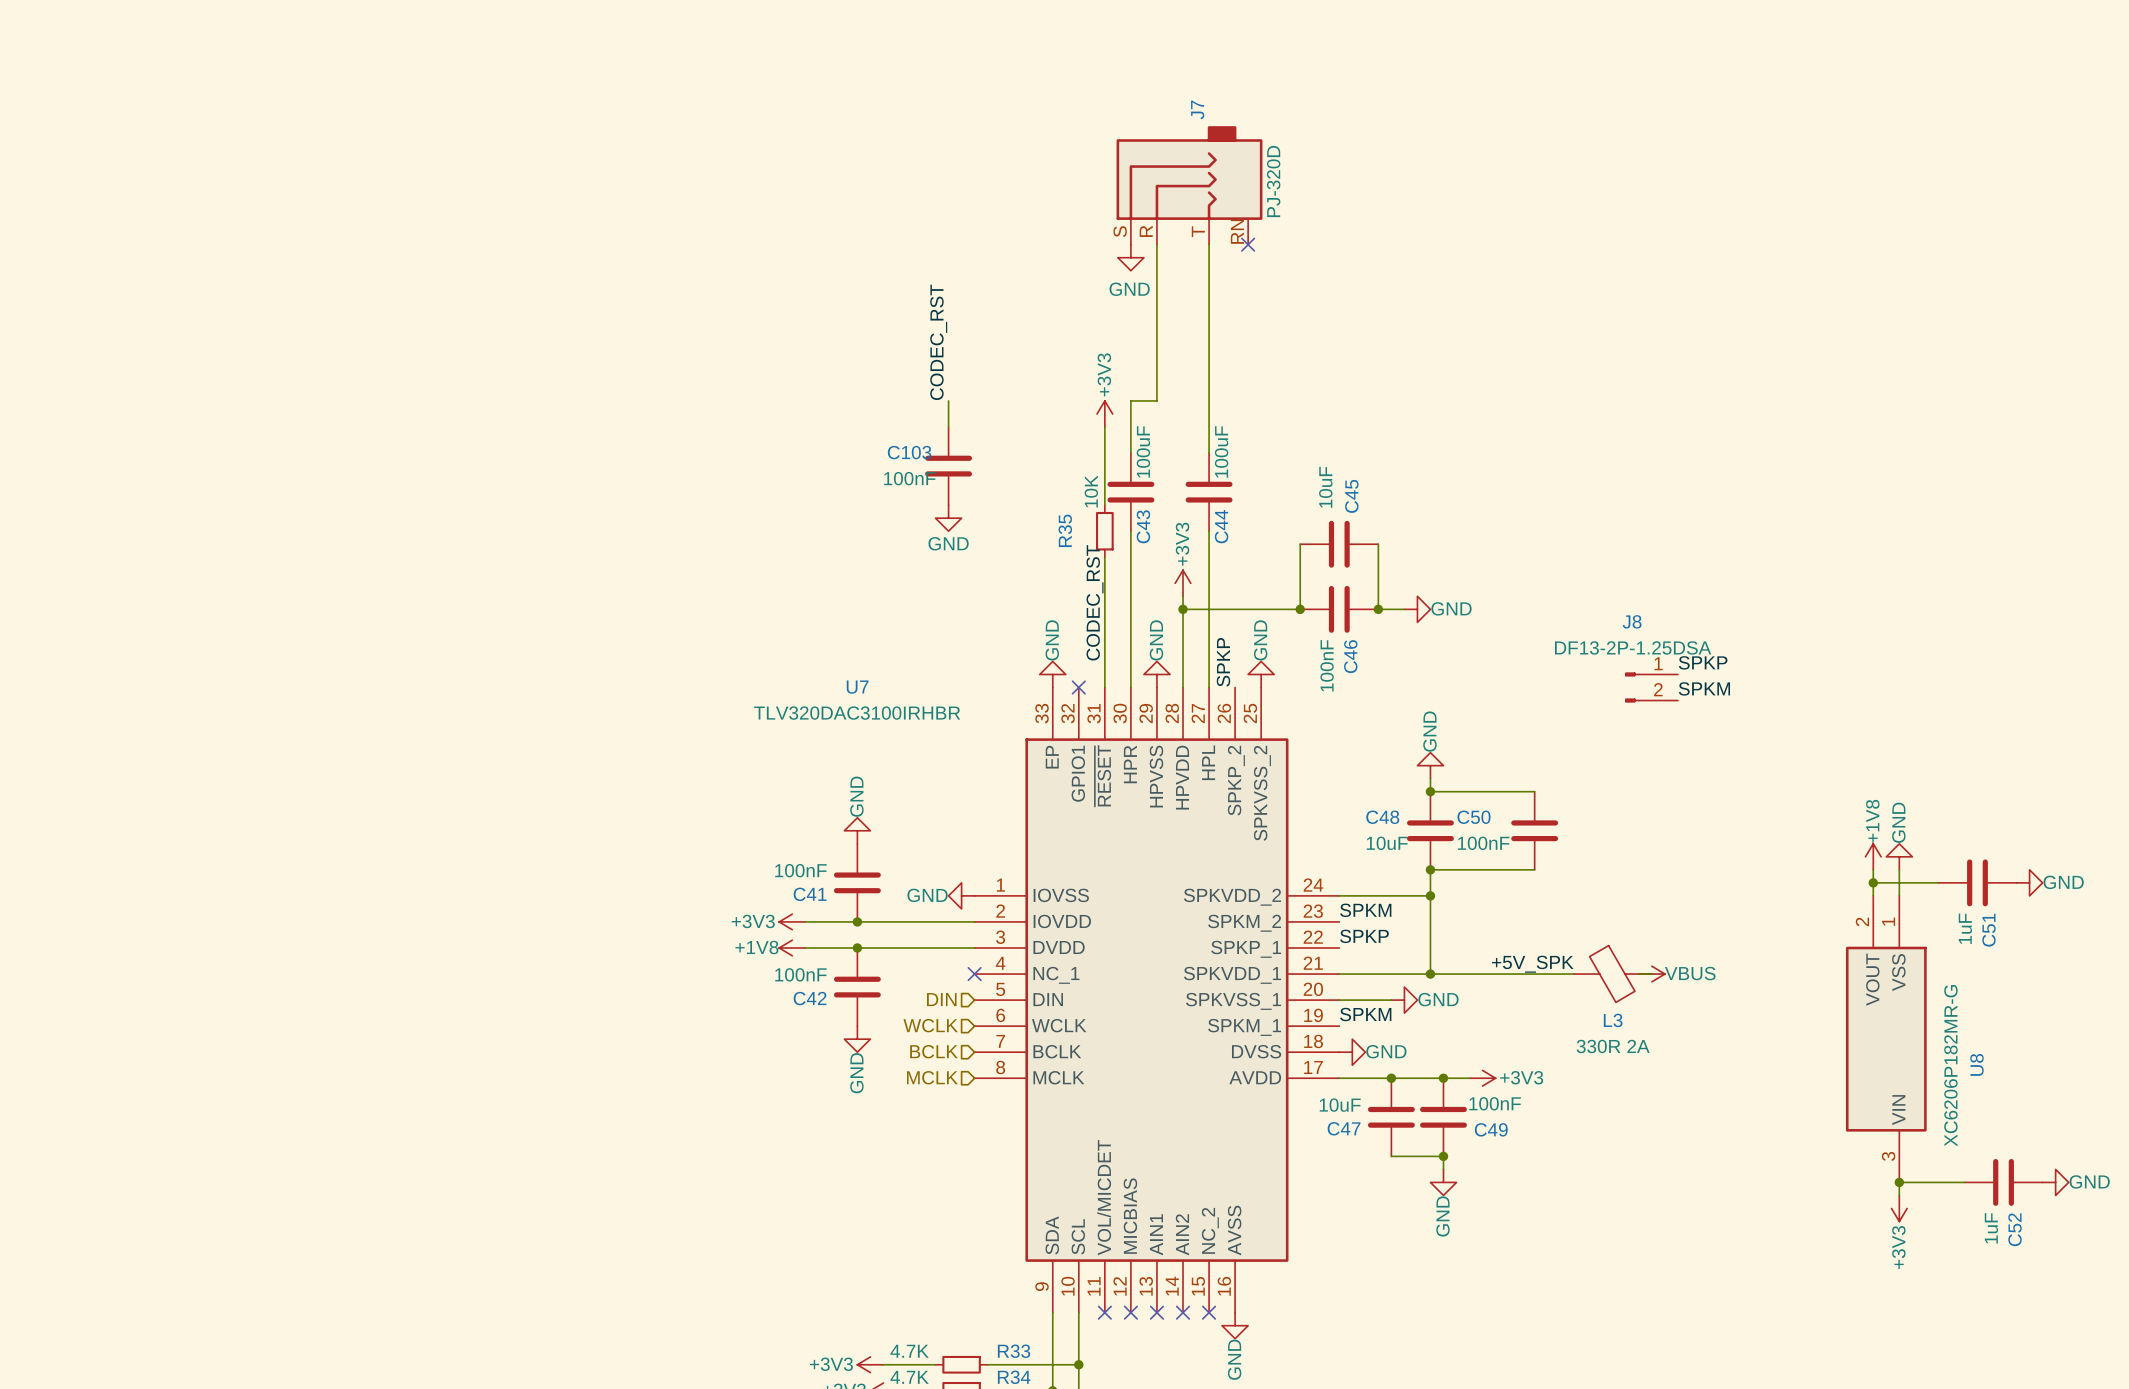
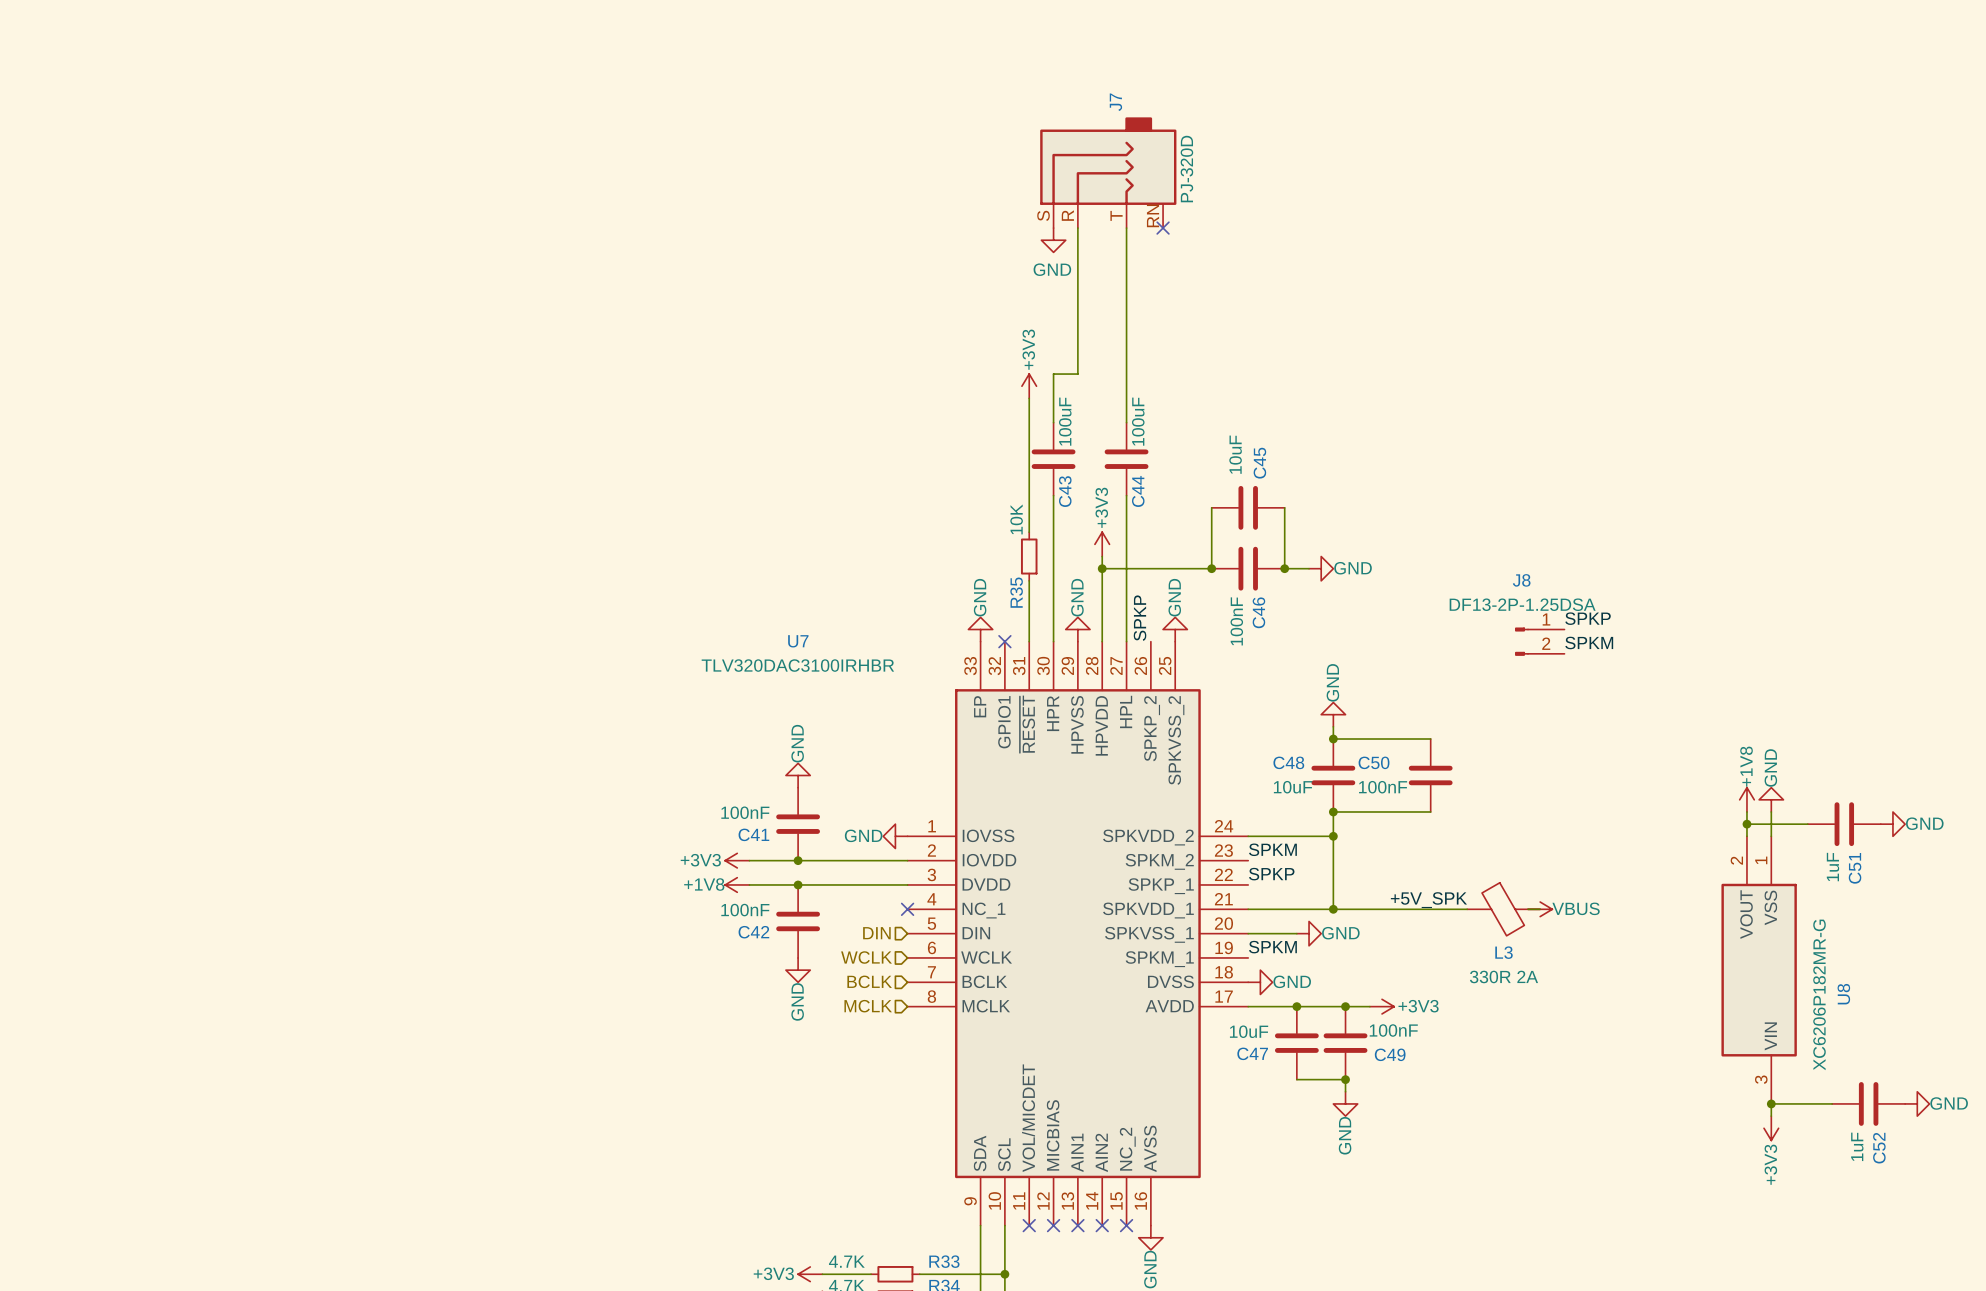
label: CODEC_RST (938, 342) -> none
wire: (948, 400) (948, 427) -> none
C103: 100nF (948, 466) -> none
power symbol: GND (948, 518) -> none
R35 name position: R35 (1065, 530) -> R35 (1016, 592)
R35 position: (1104, 531) -> (1029, 556)
wire: (1104, 570) (1104, 622) -> (1029, 471) (1029, 520)
label: CODEC_RST (1095, 602) -> none

